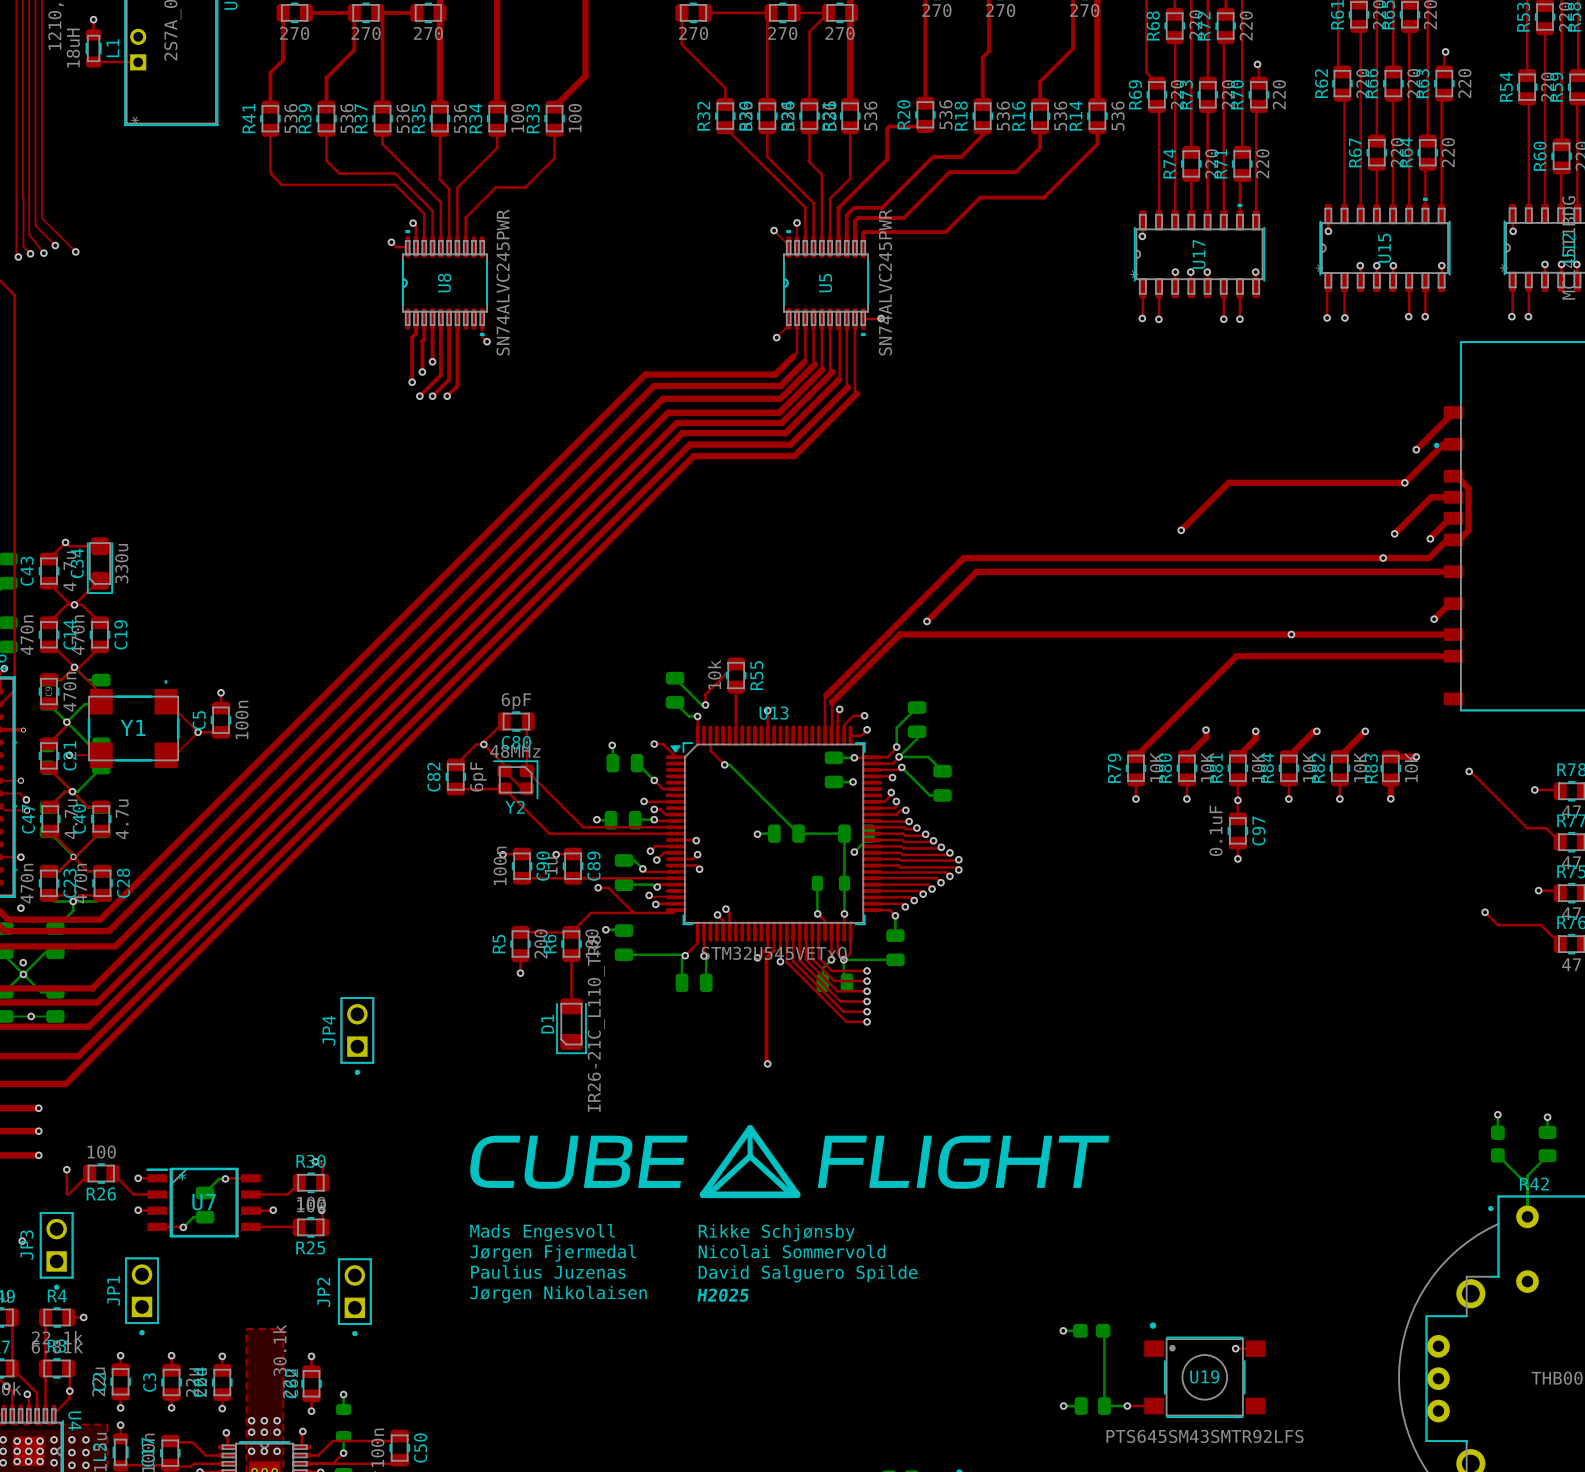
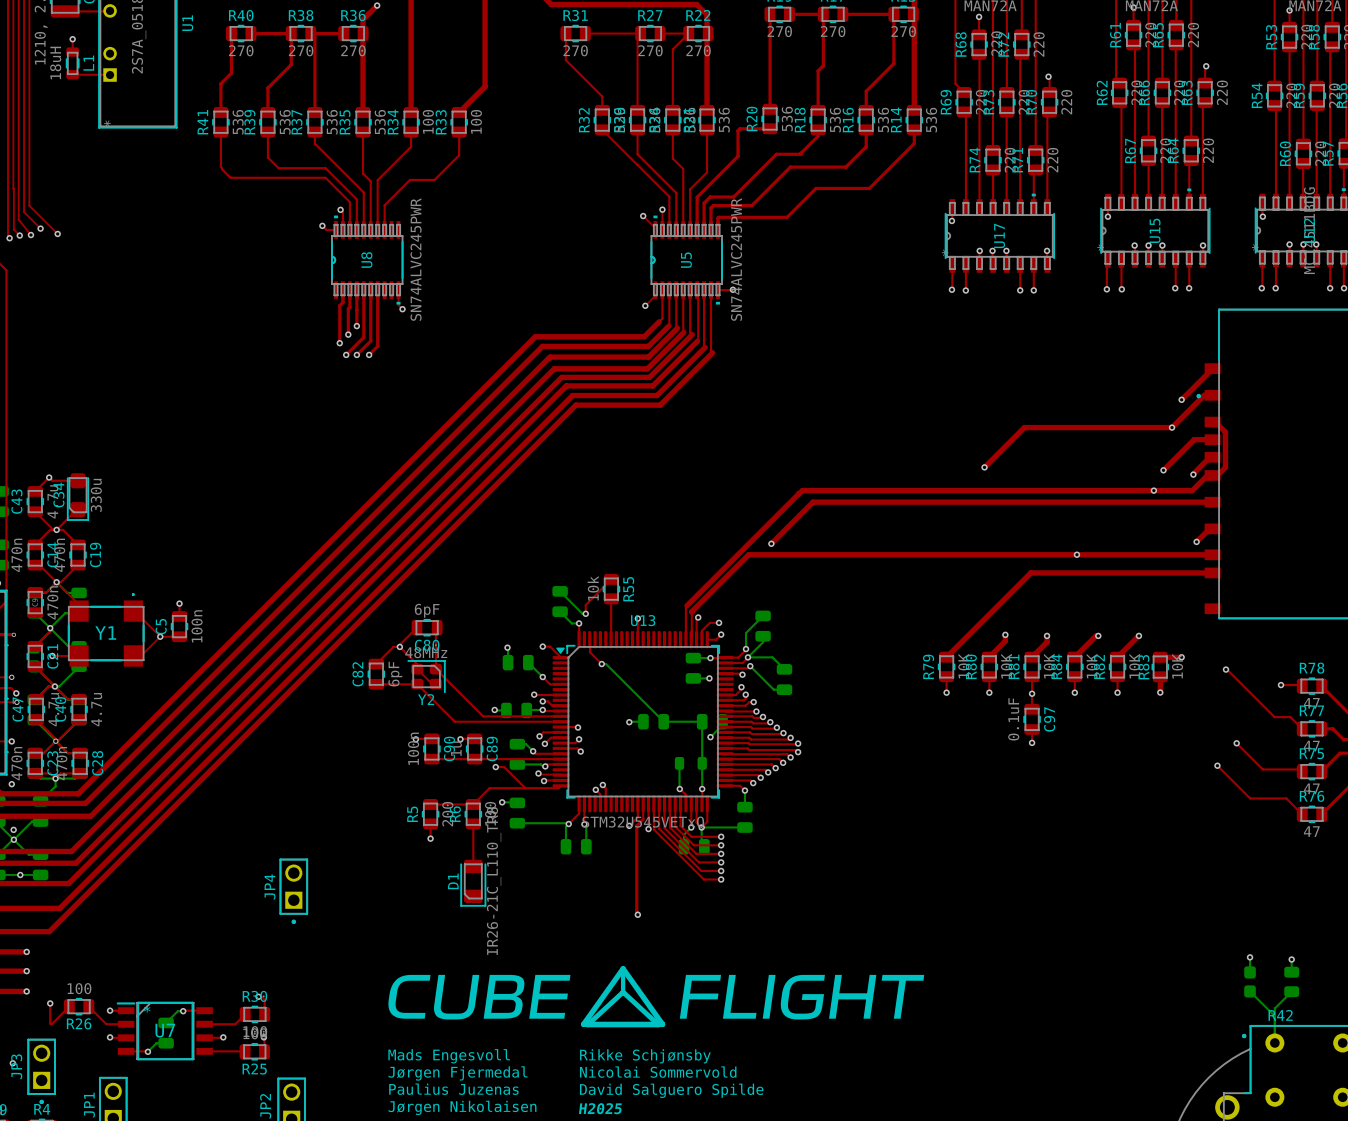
top track: none -> (1236, 743) (1262, 769) (1284, 769)
via: none -> (1236, 743)
top track: none -> (1217, 765) (1239, 787)
via: none -> (1217, 765)
via: (1538, 890) -> none
via: (1485, 912) -> none

